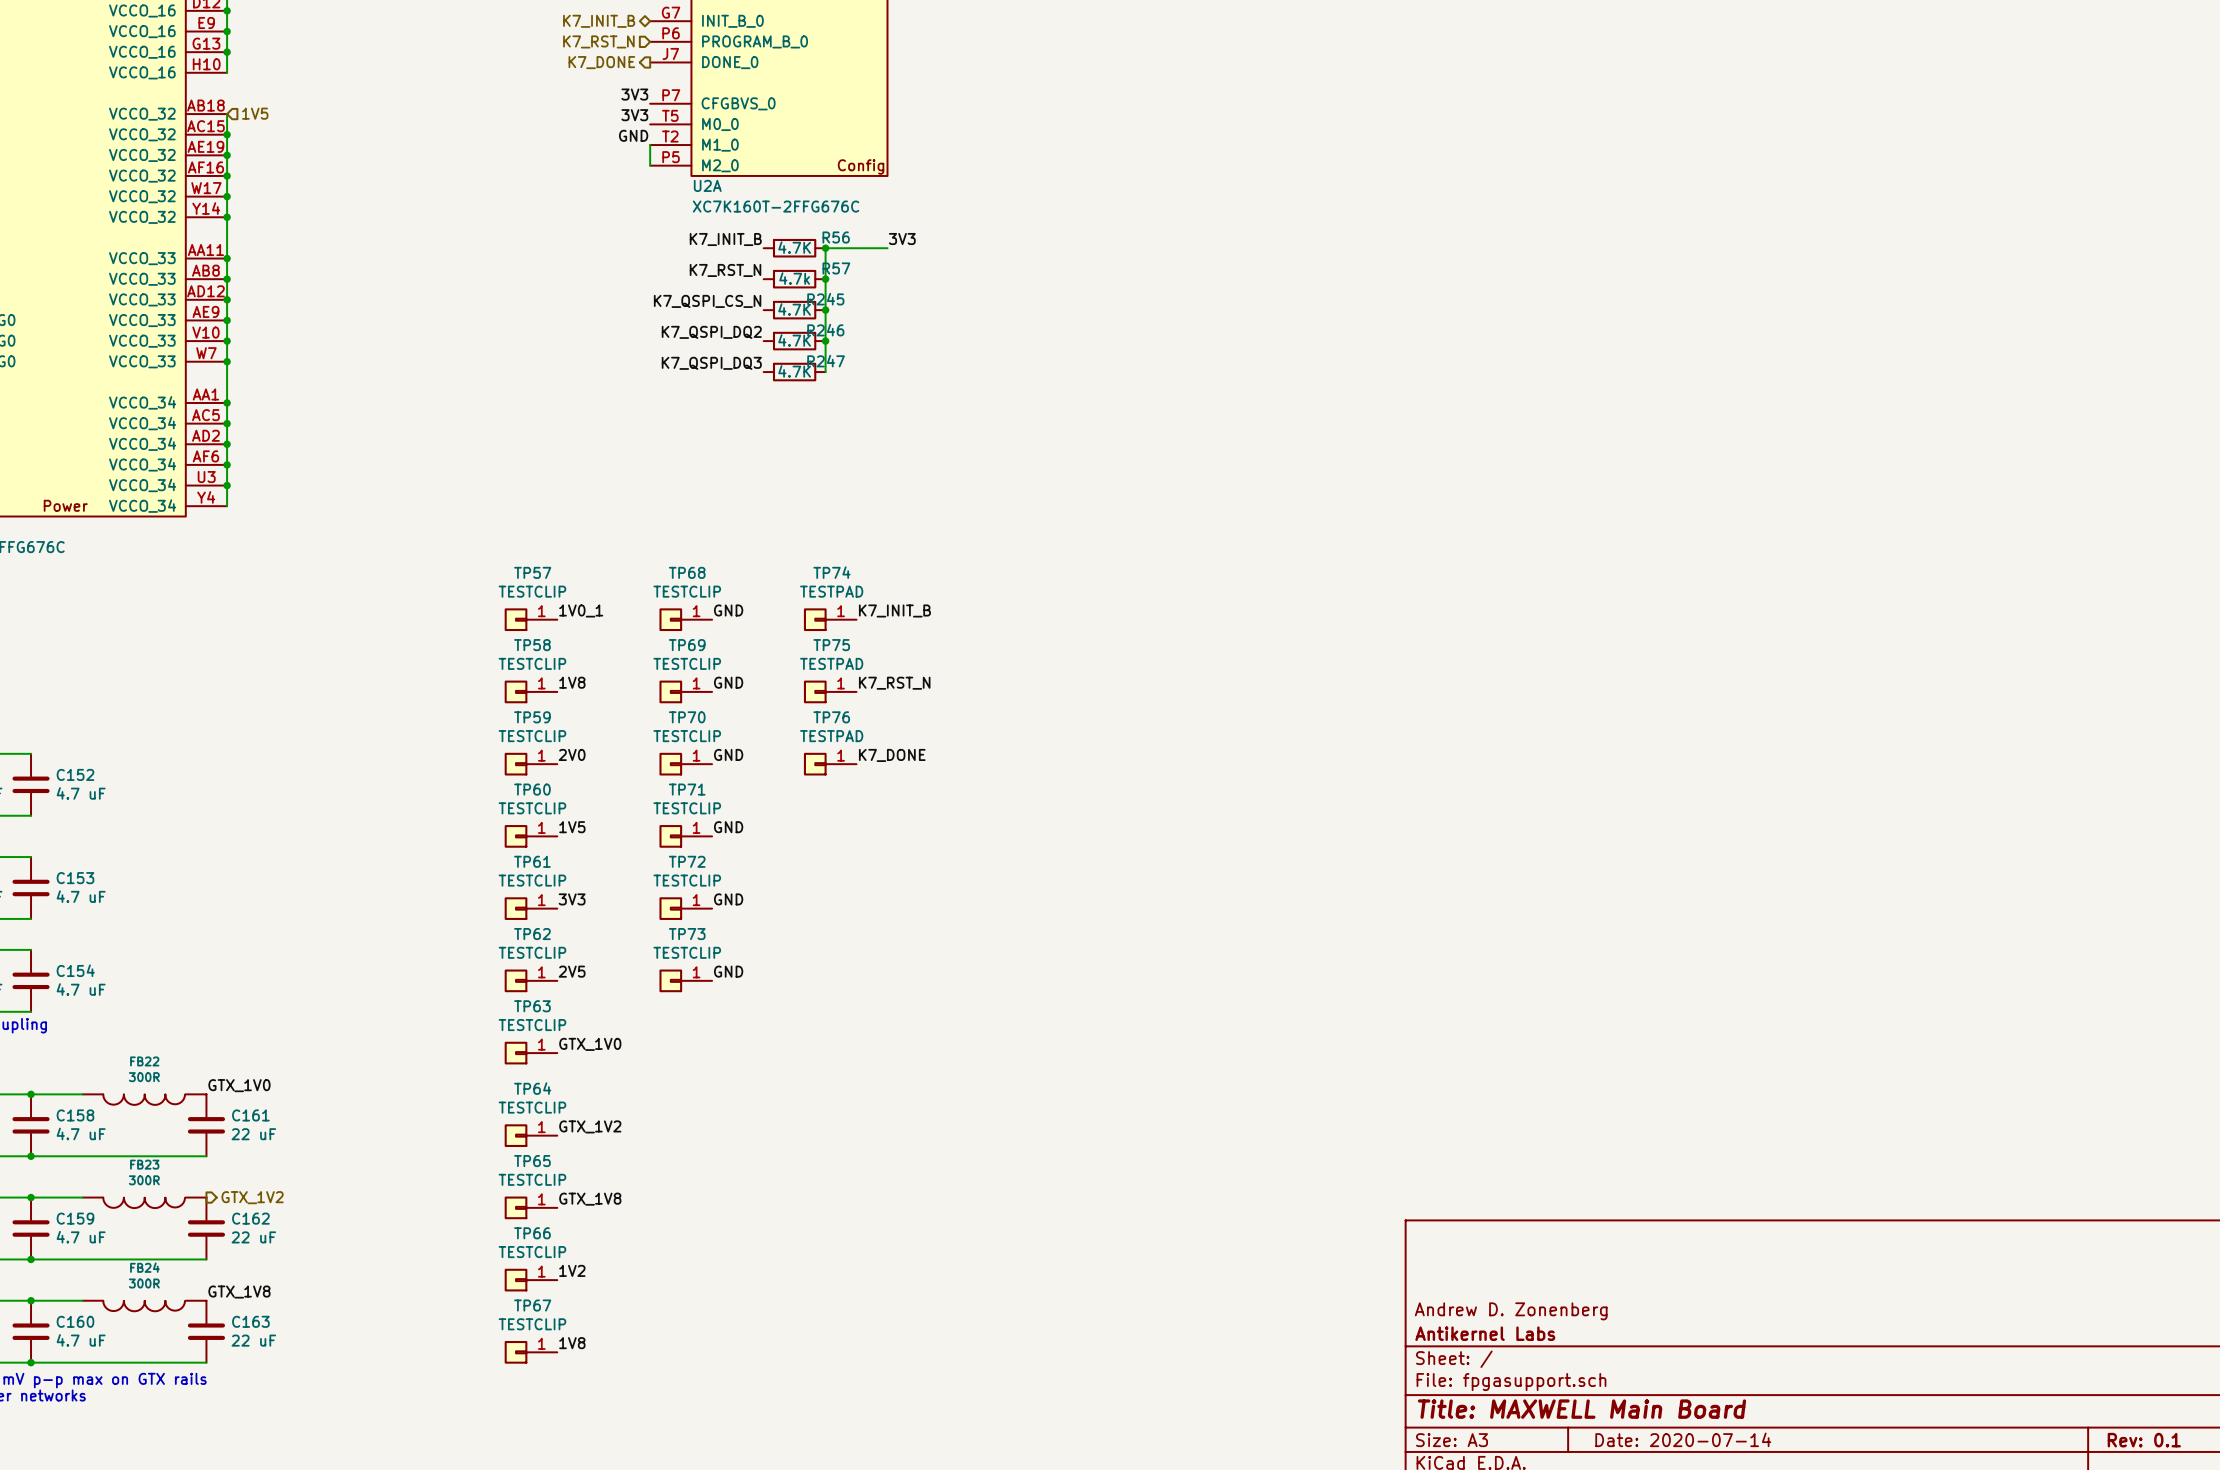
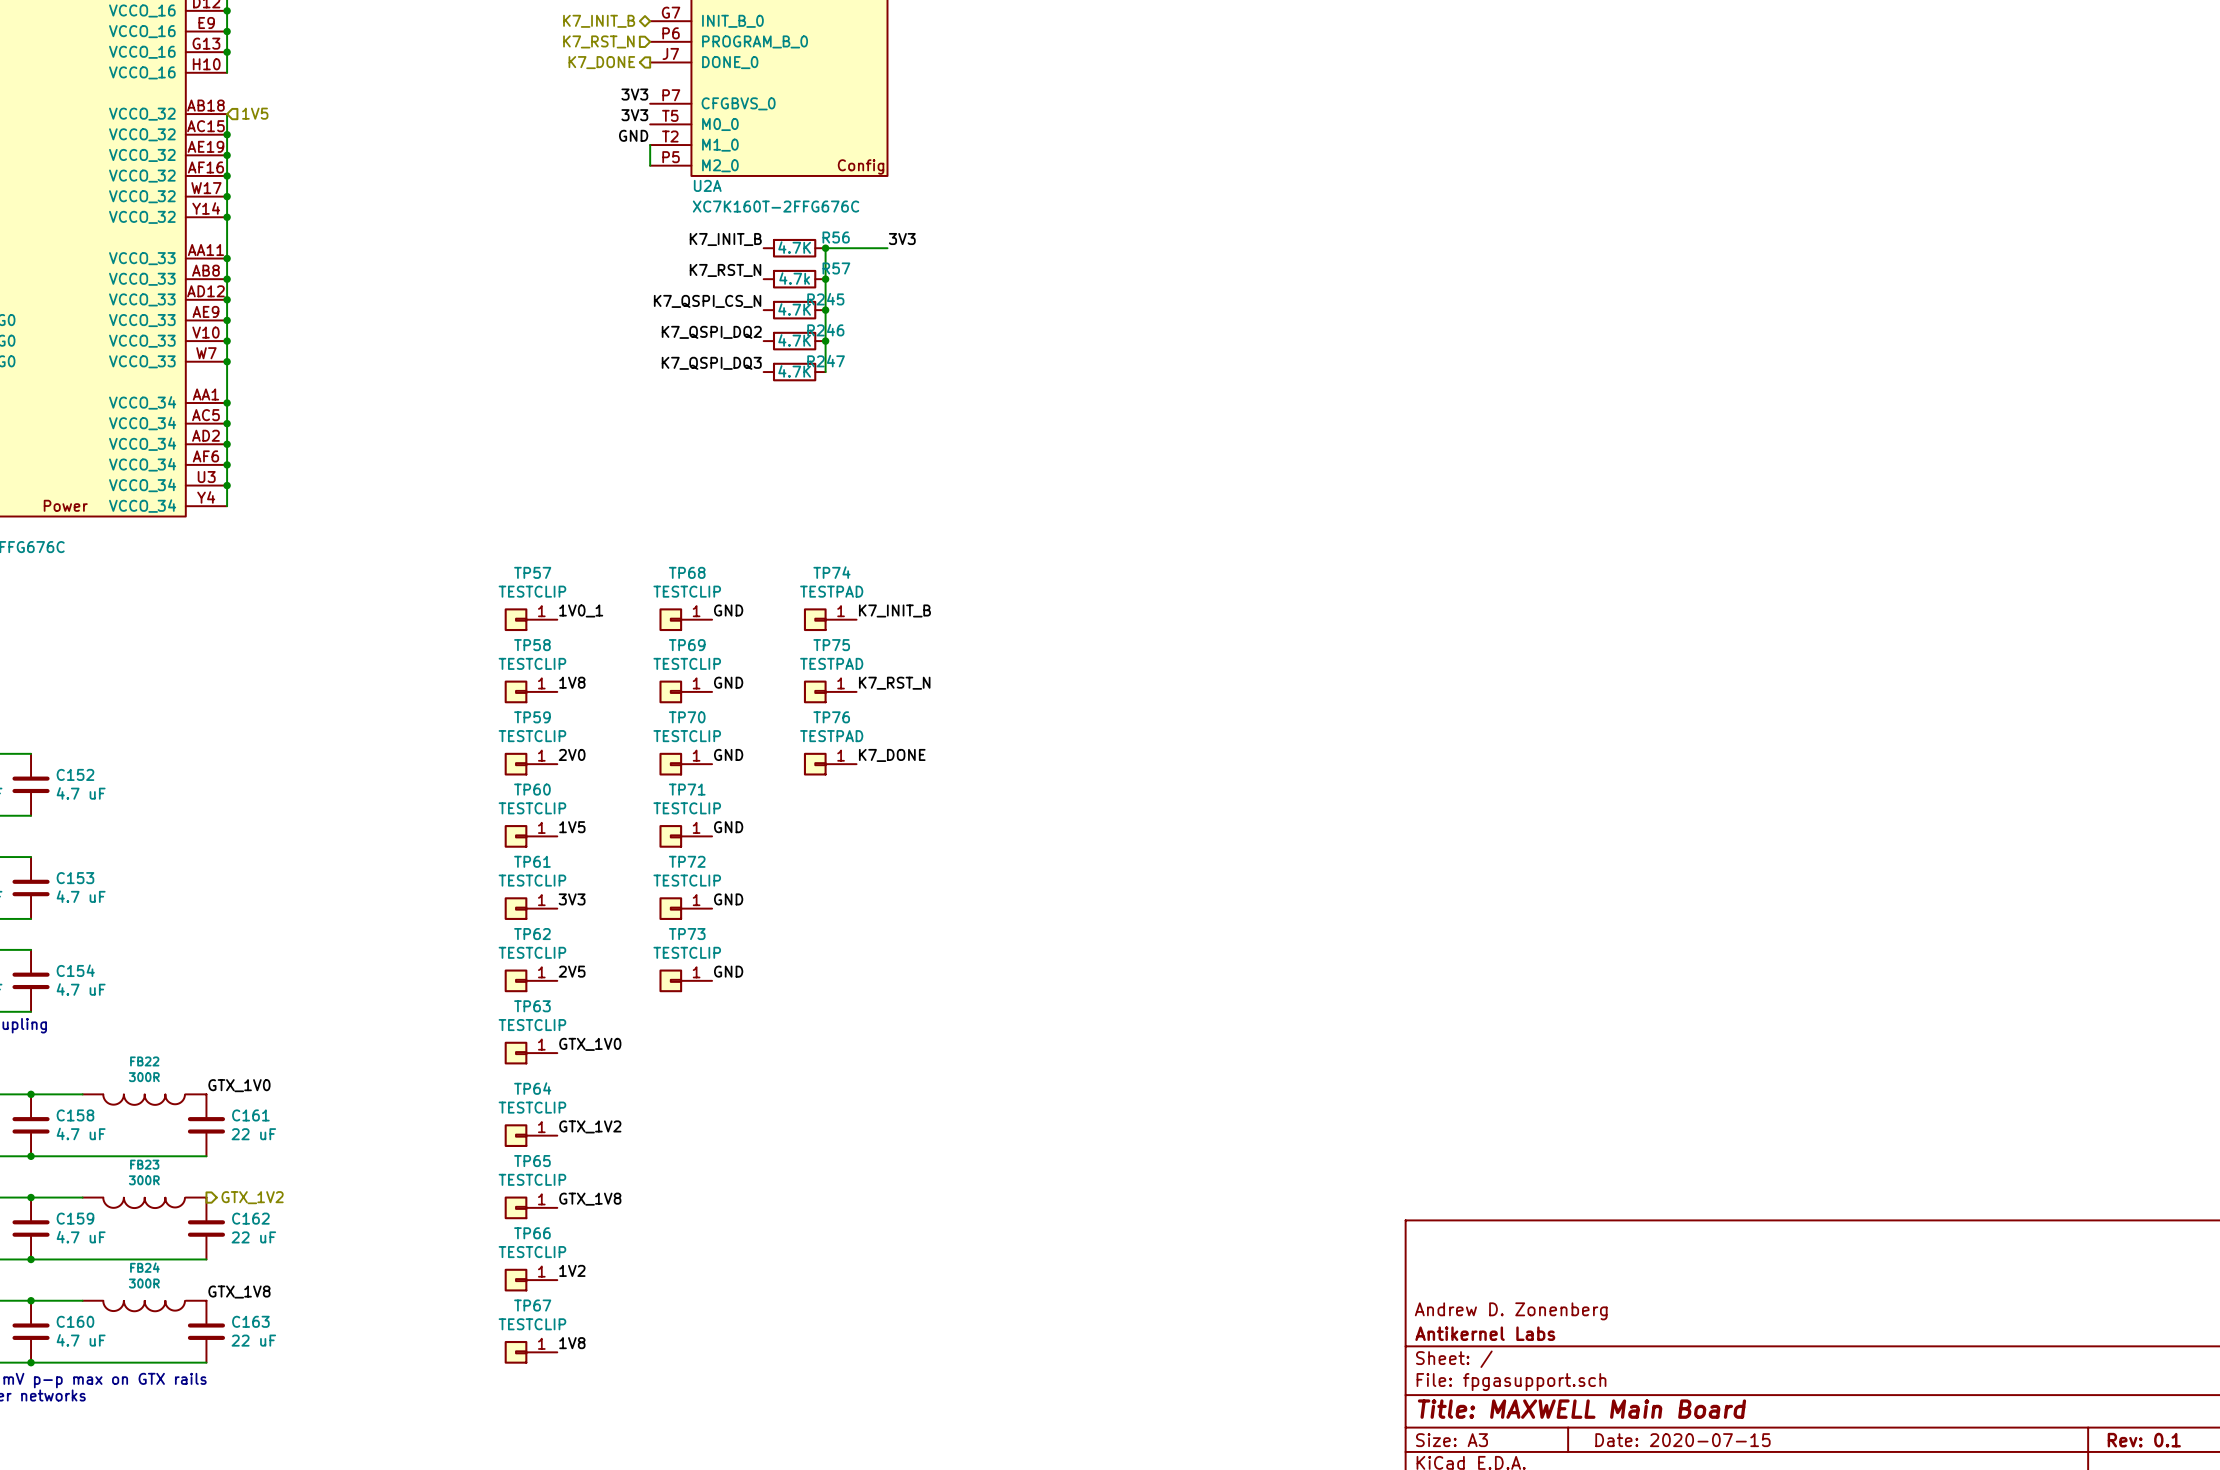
title block: Date: 2020-07-14 (1683, 1439) -> Date: 2020-07-15 (1682, 1440)

